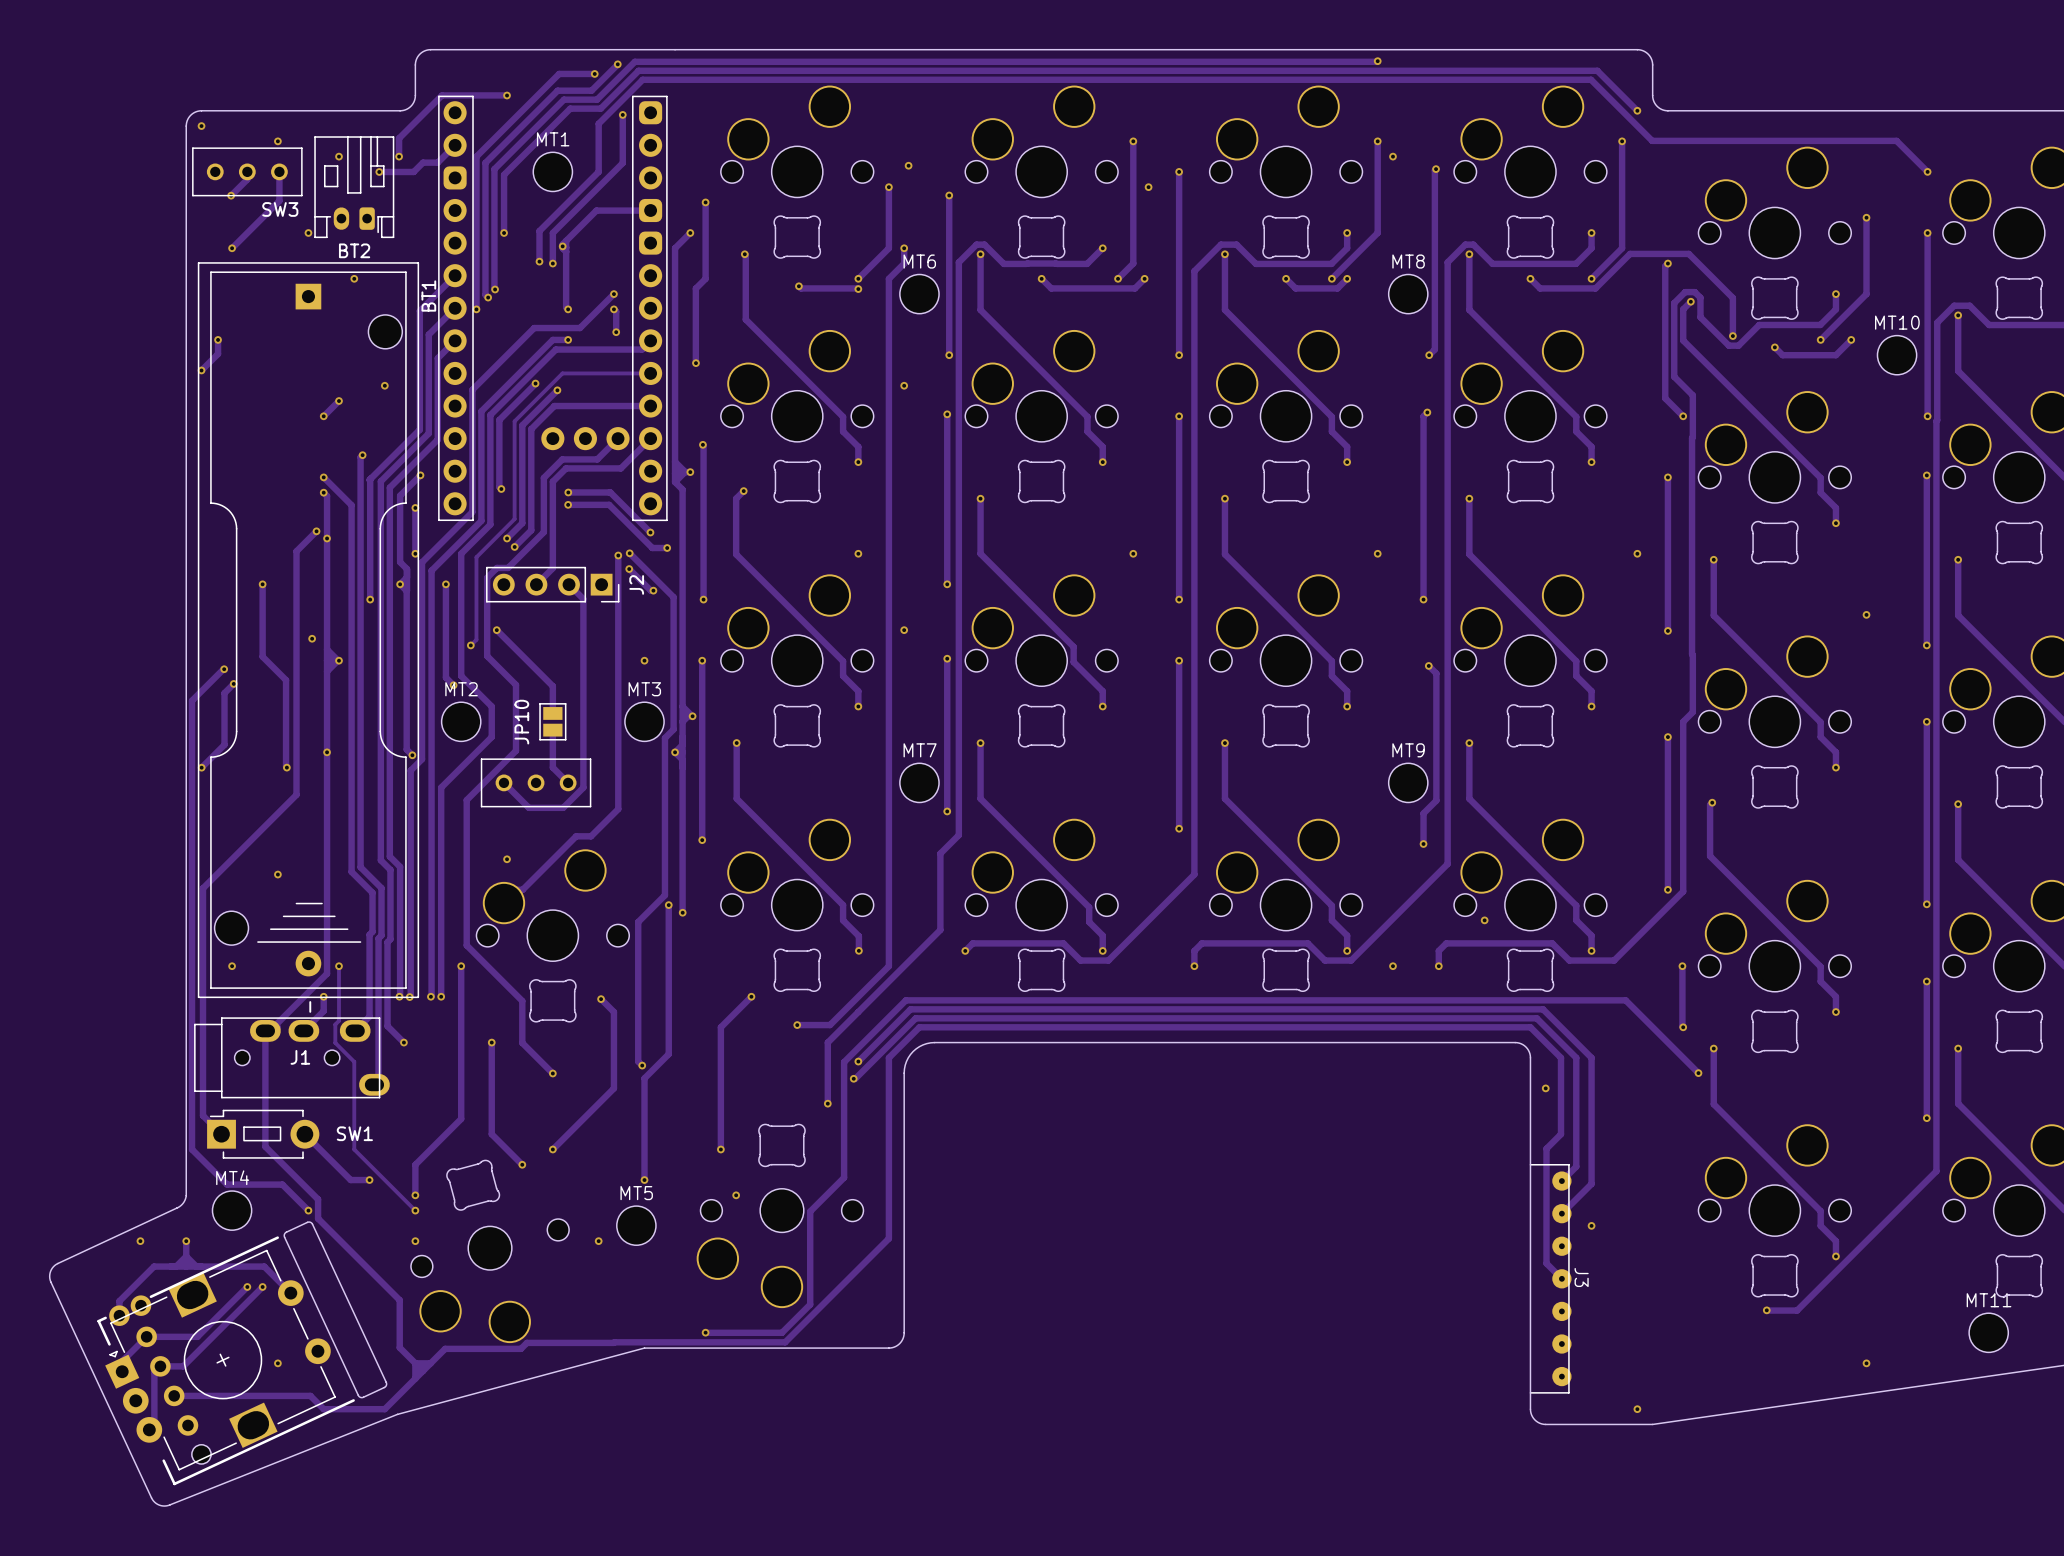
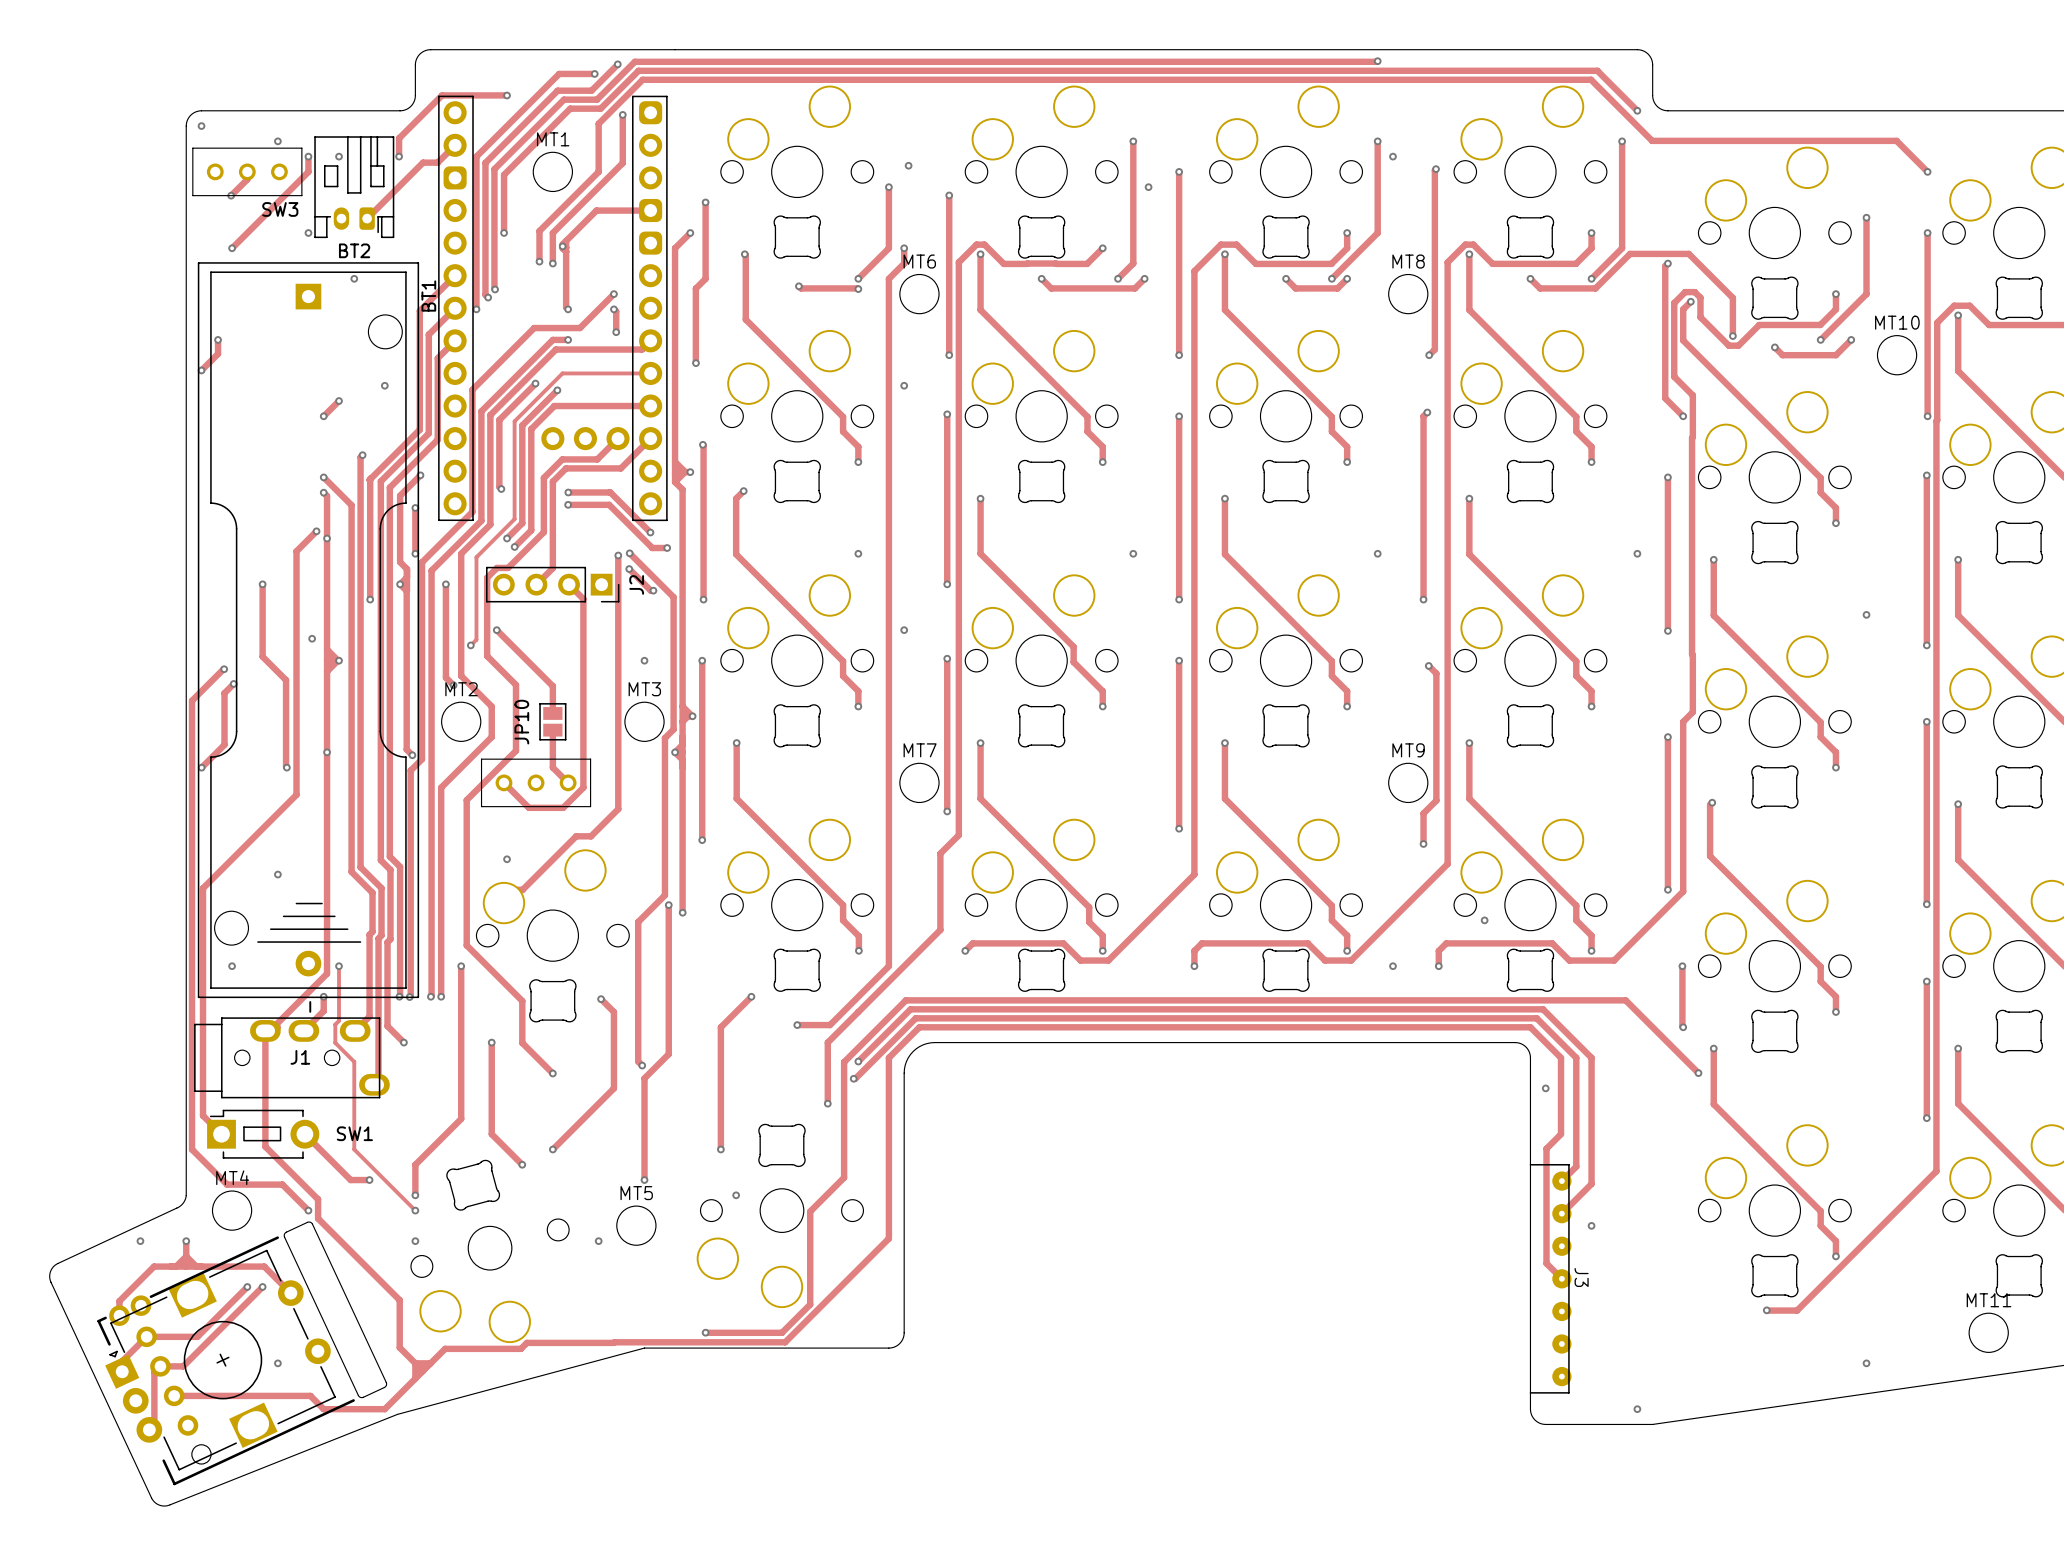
track: (279, 171) (279, 200) -> (308, 156) (308, 171) (279, 200)
track: (379, 171) (413, 171) -> (367, 218) (413, 171)
via position: (379, 171) -> (308, 156)

